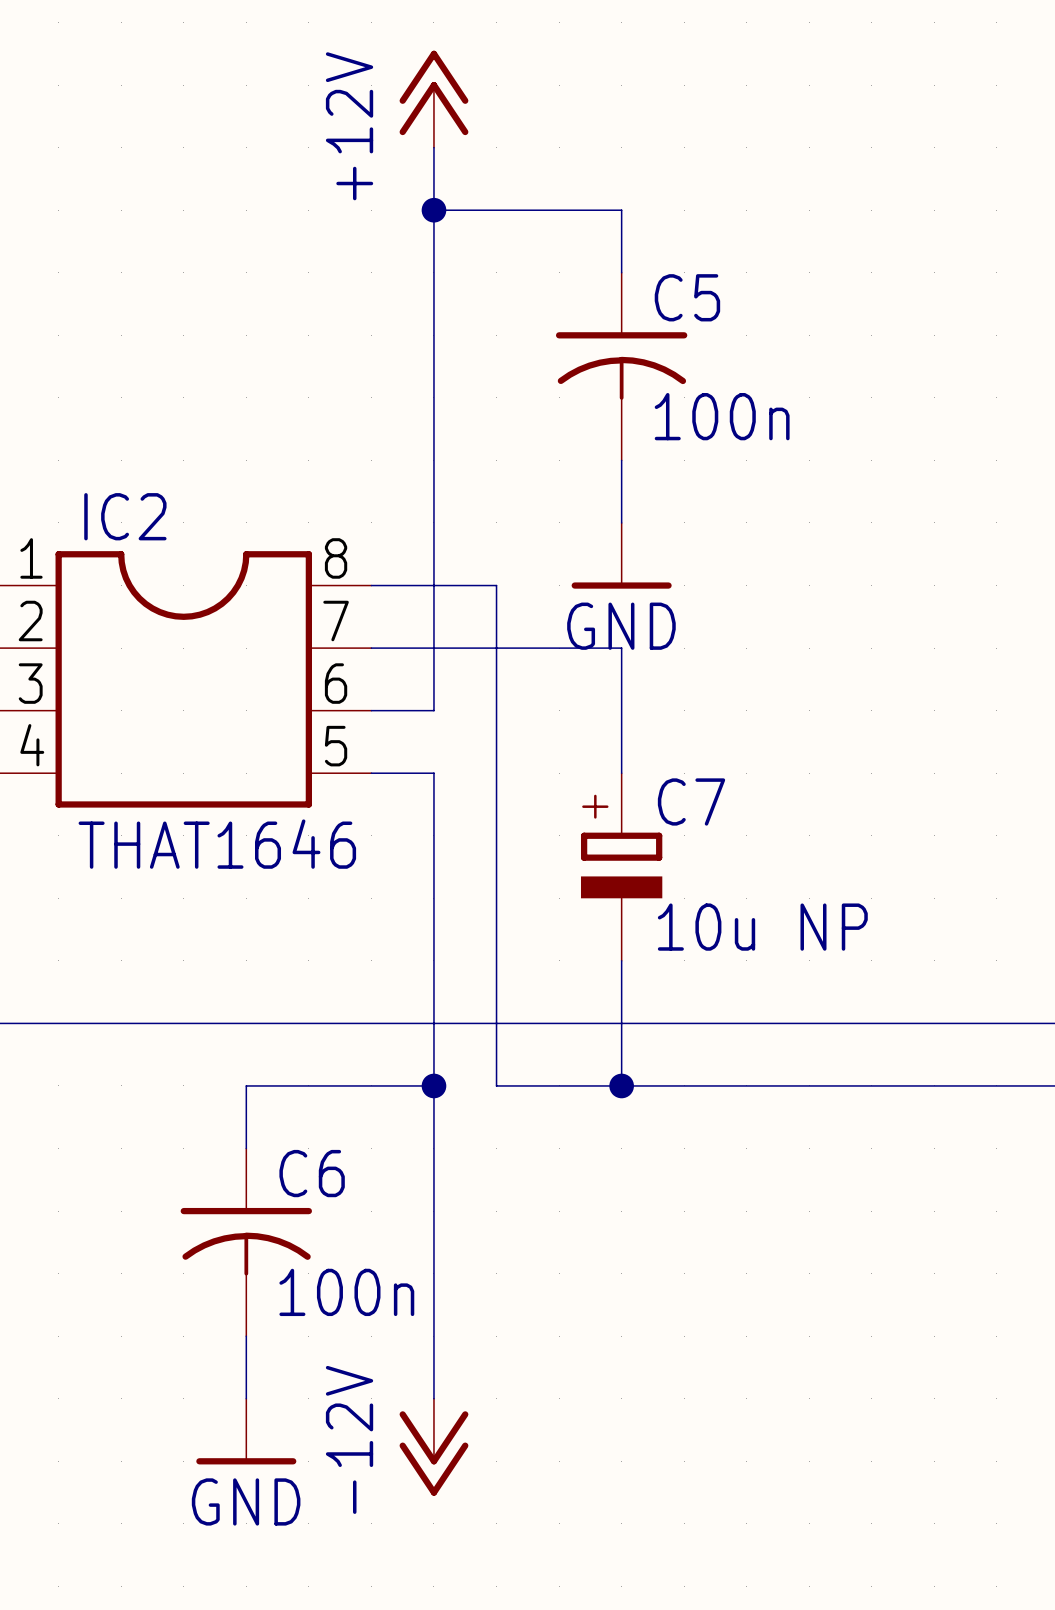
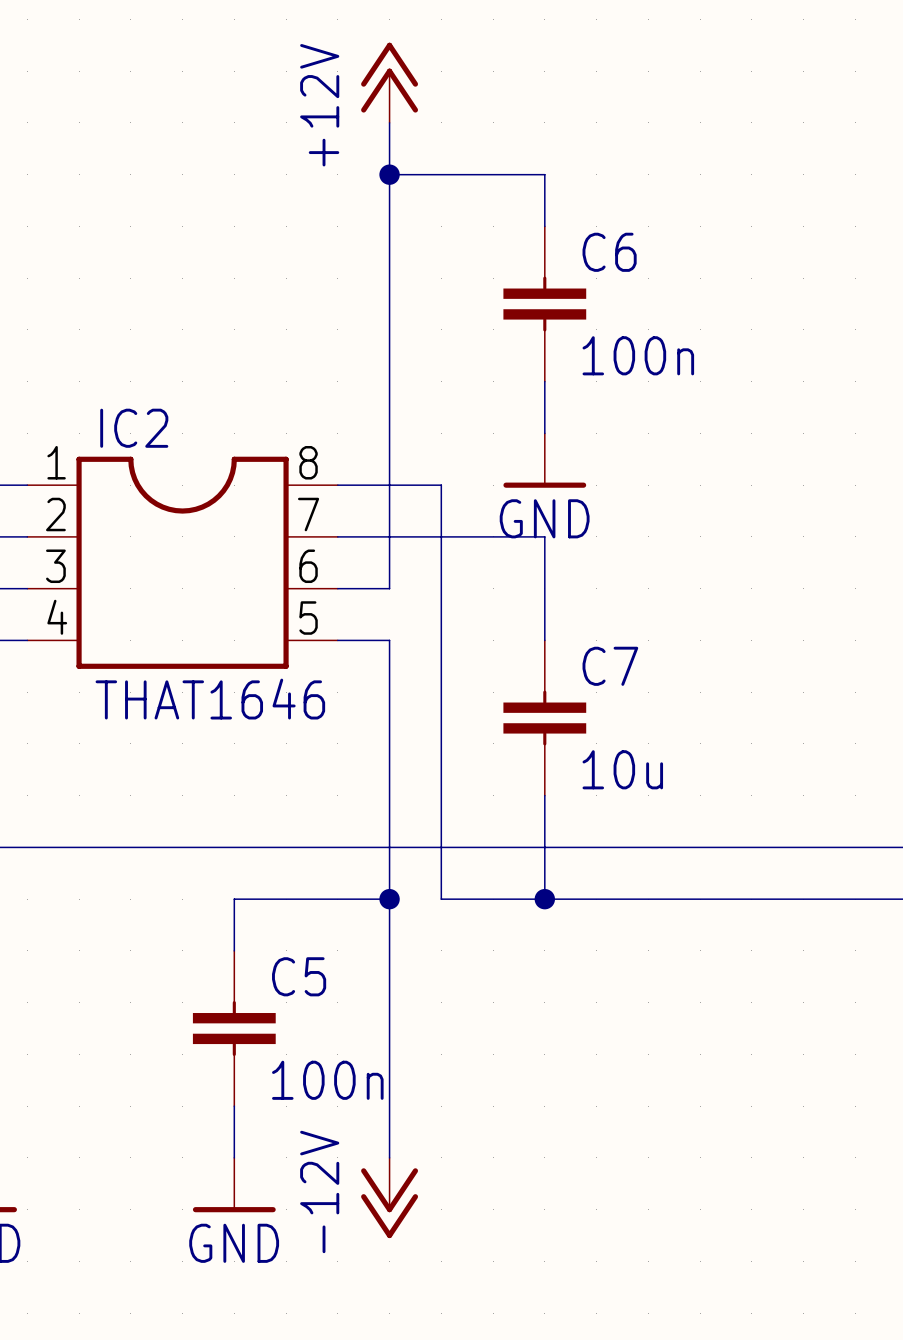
C5 symbol: [555, 272, 688, 461] -> [192, 950, 276, 1107]
C7 symbol: [580, 773, 663, 961] -> [503, 640, 587, 796]
C7 value: 10u NP (762, 927) -> 10u (622, 769)
C6 symbol: [180, 1148, 313, 1337] -> [503, 226, 587, 382]

